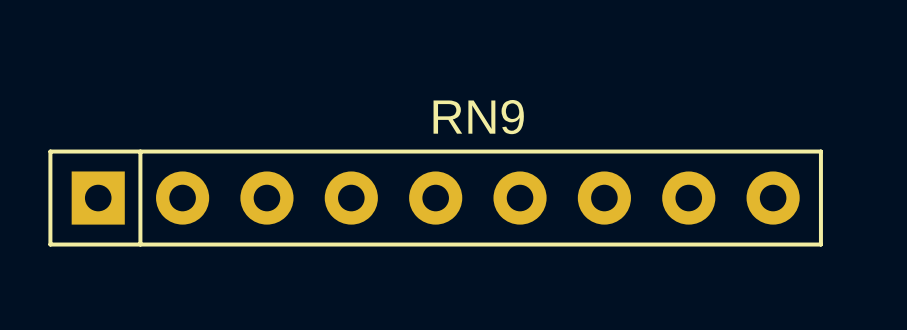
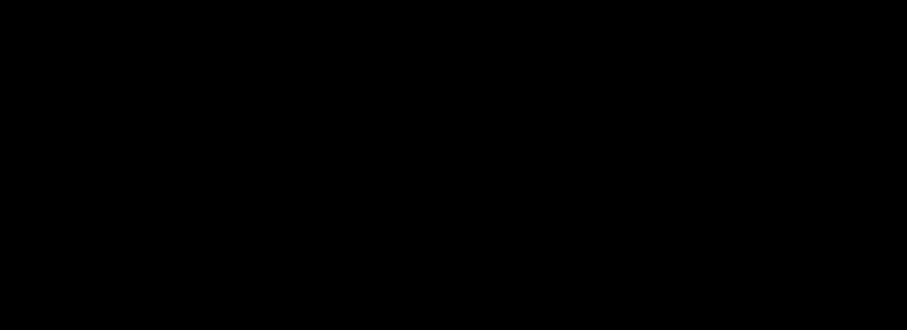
RN9: (435, 198) -> none

